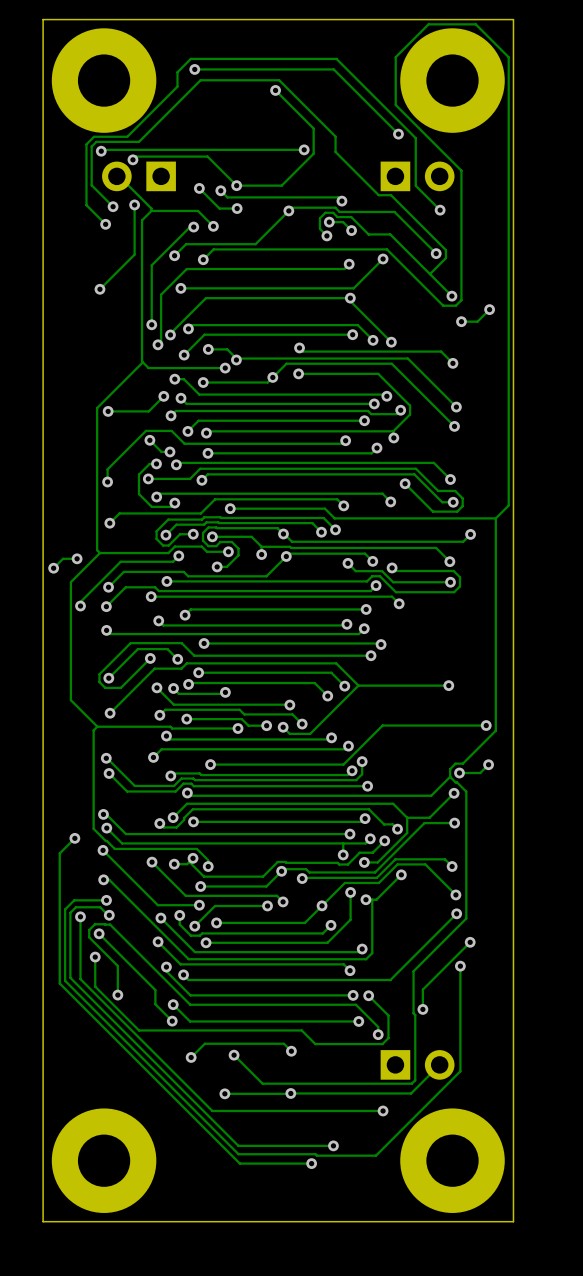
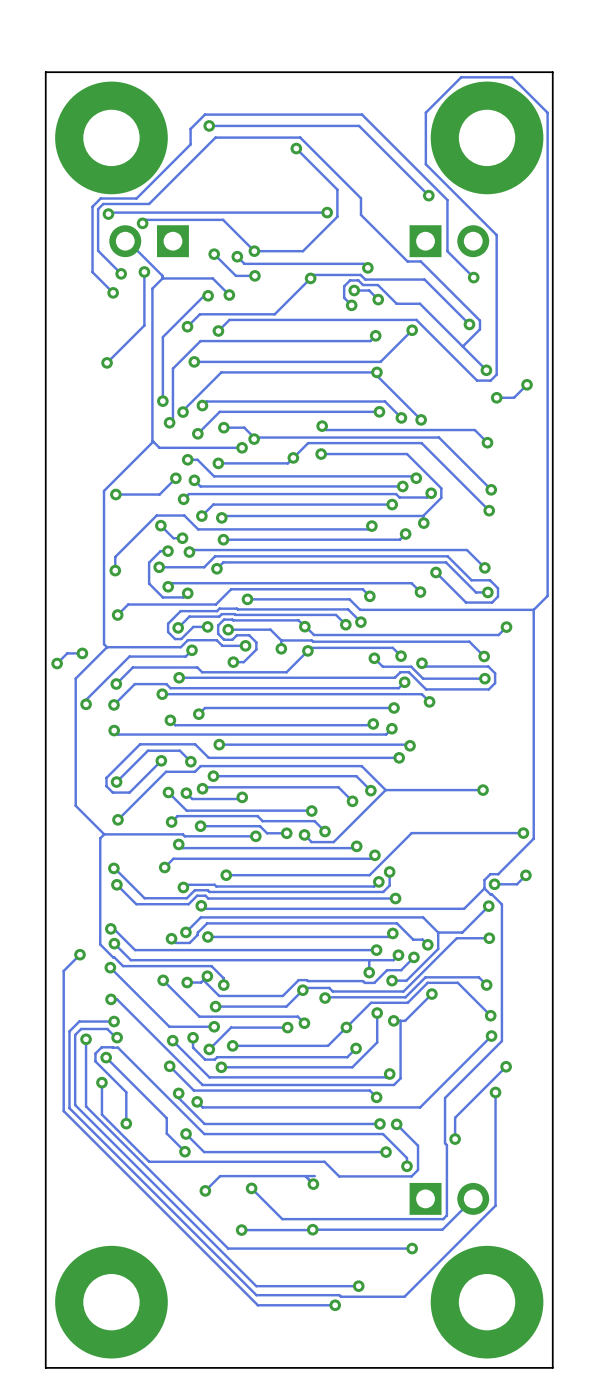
track: none -> (314, 1176) (305, 1176)

